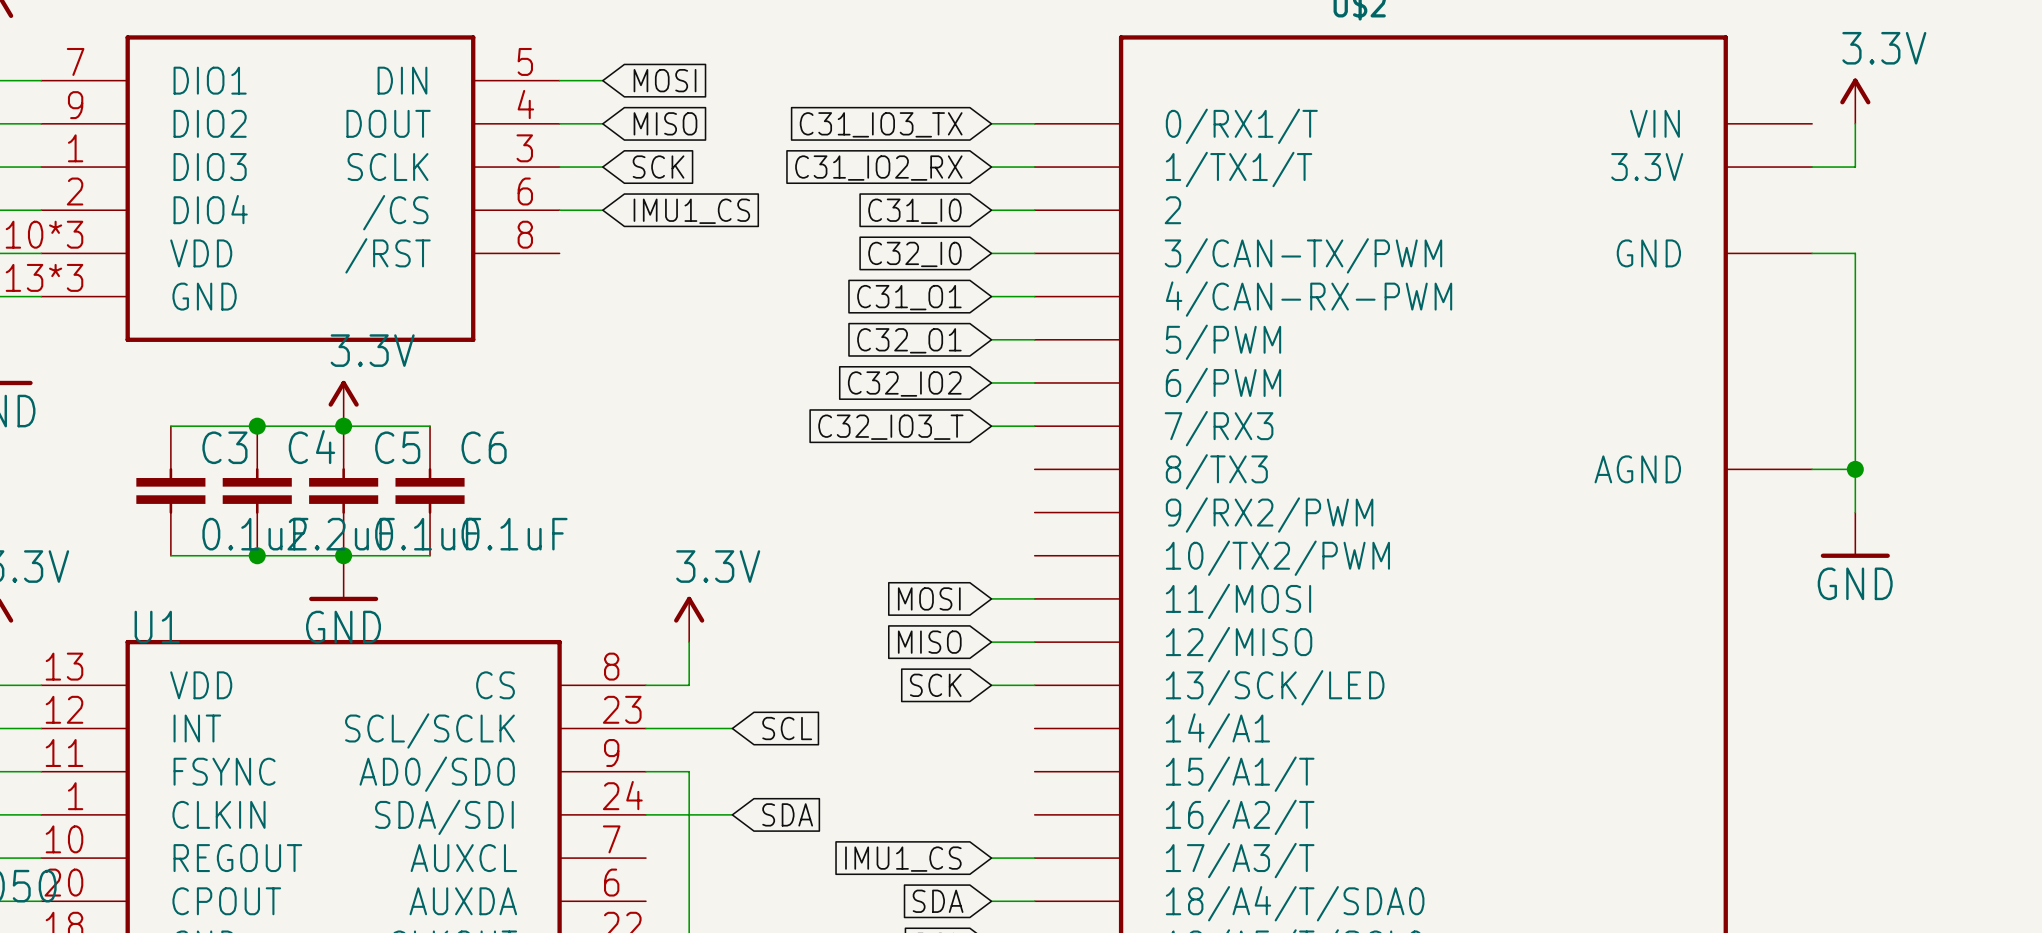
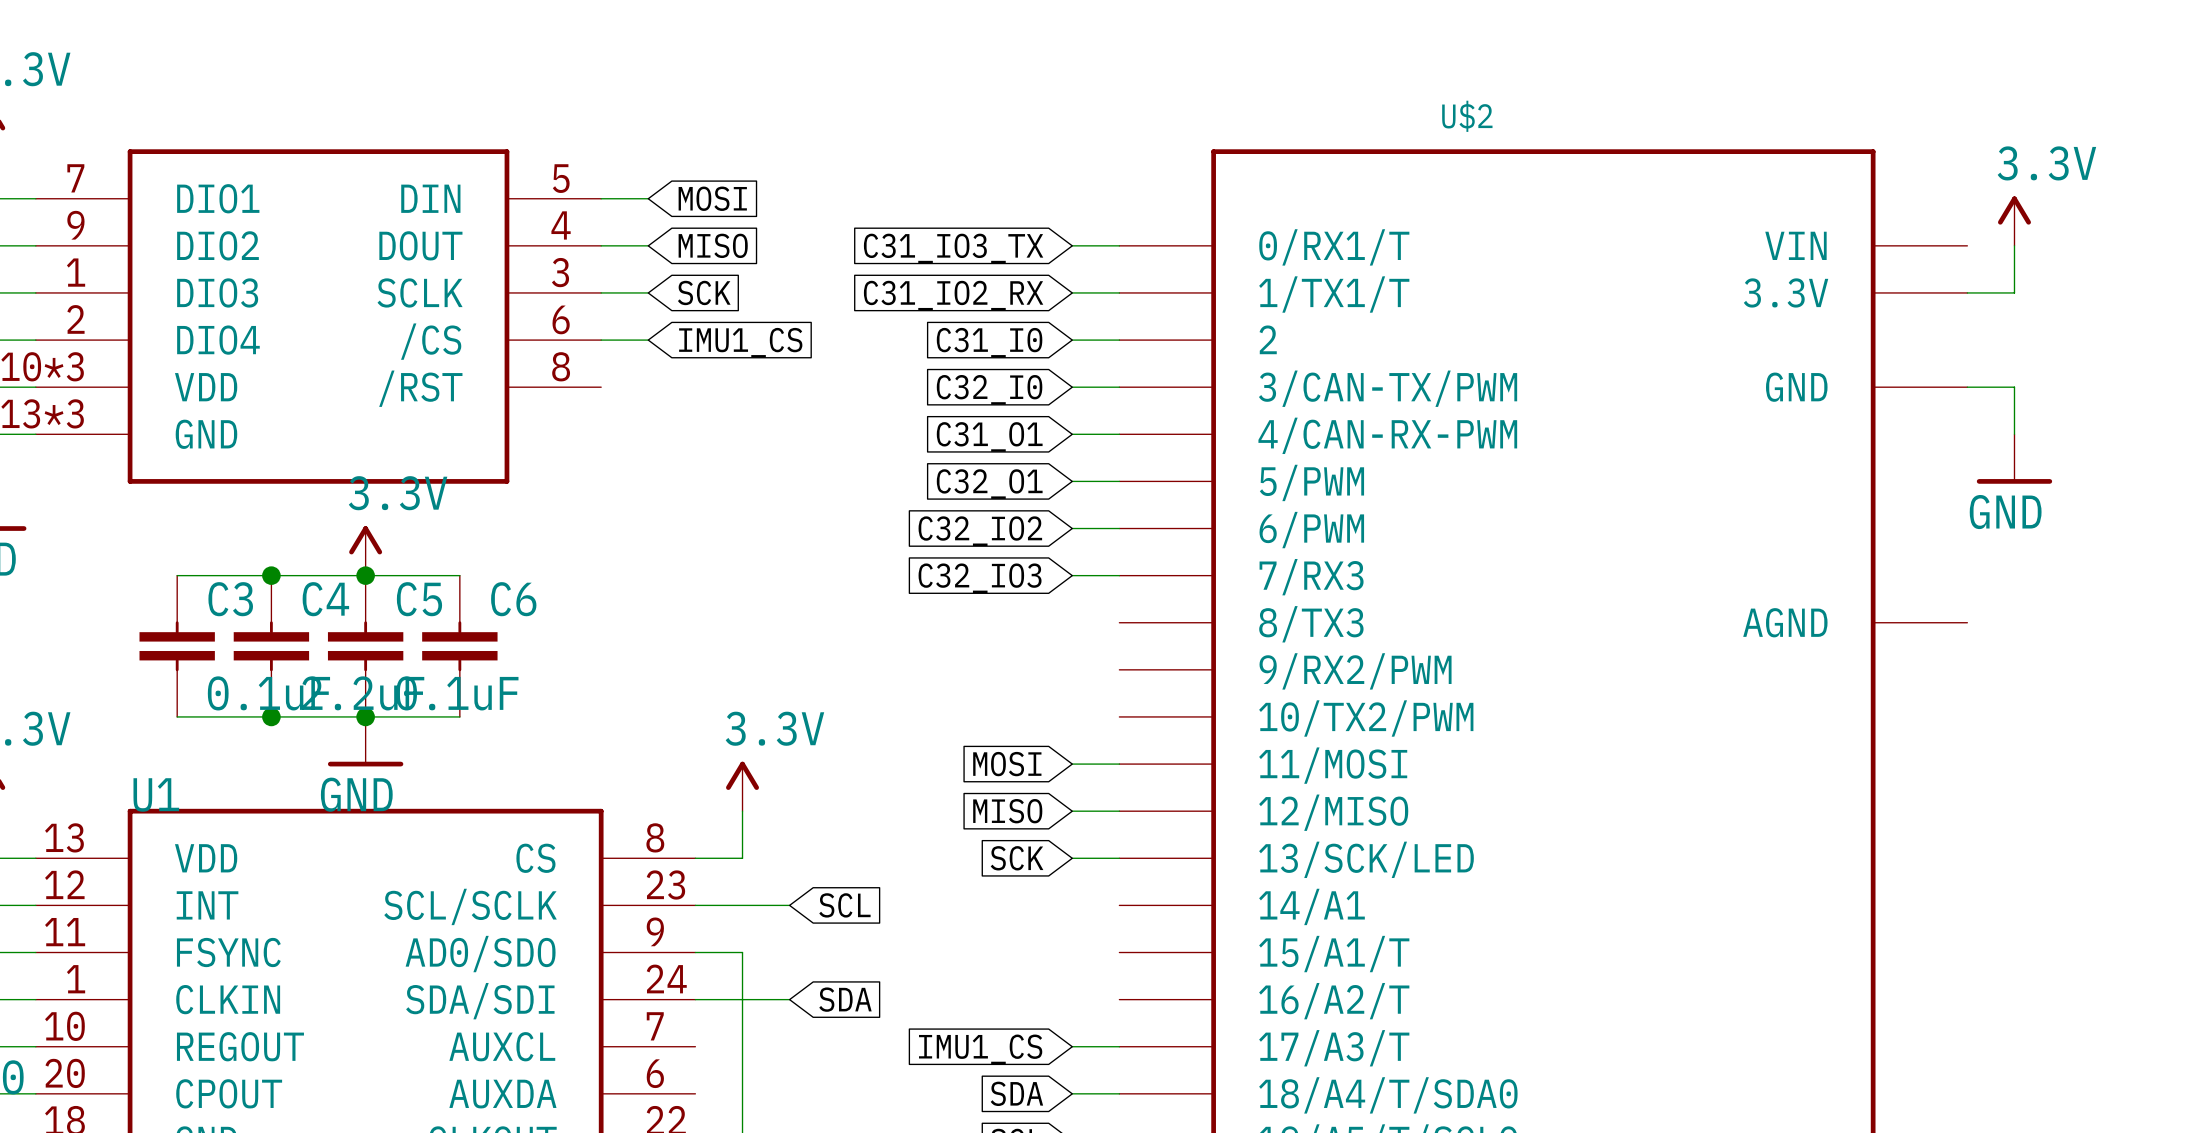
wire: (1855, 296) (1855, 512) -> none
global label: C32_IO3_T (890, 427) -> C32_IO3 (980, 578)
wire: (1812, 469) (1855, 469) -> none
junction: (1855, 469) -> none
C6 value: 0.1uF (514, 534) -> none
power symbol position: GND (1855, 535) -> GND (2014, 459)

